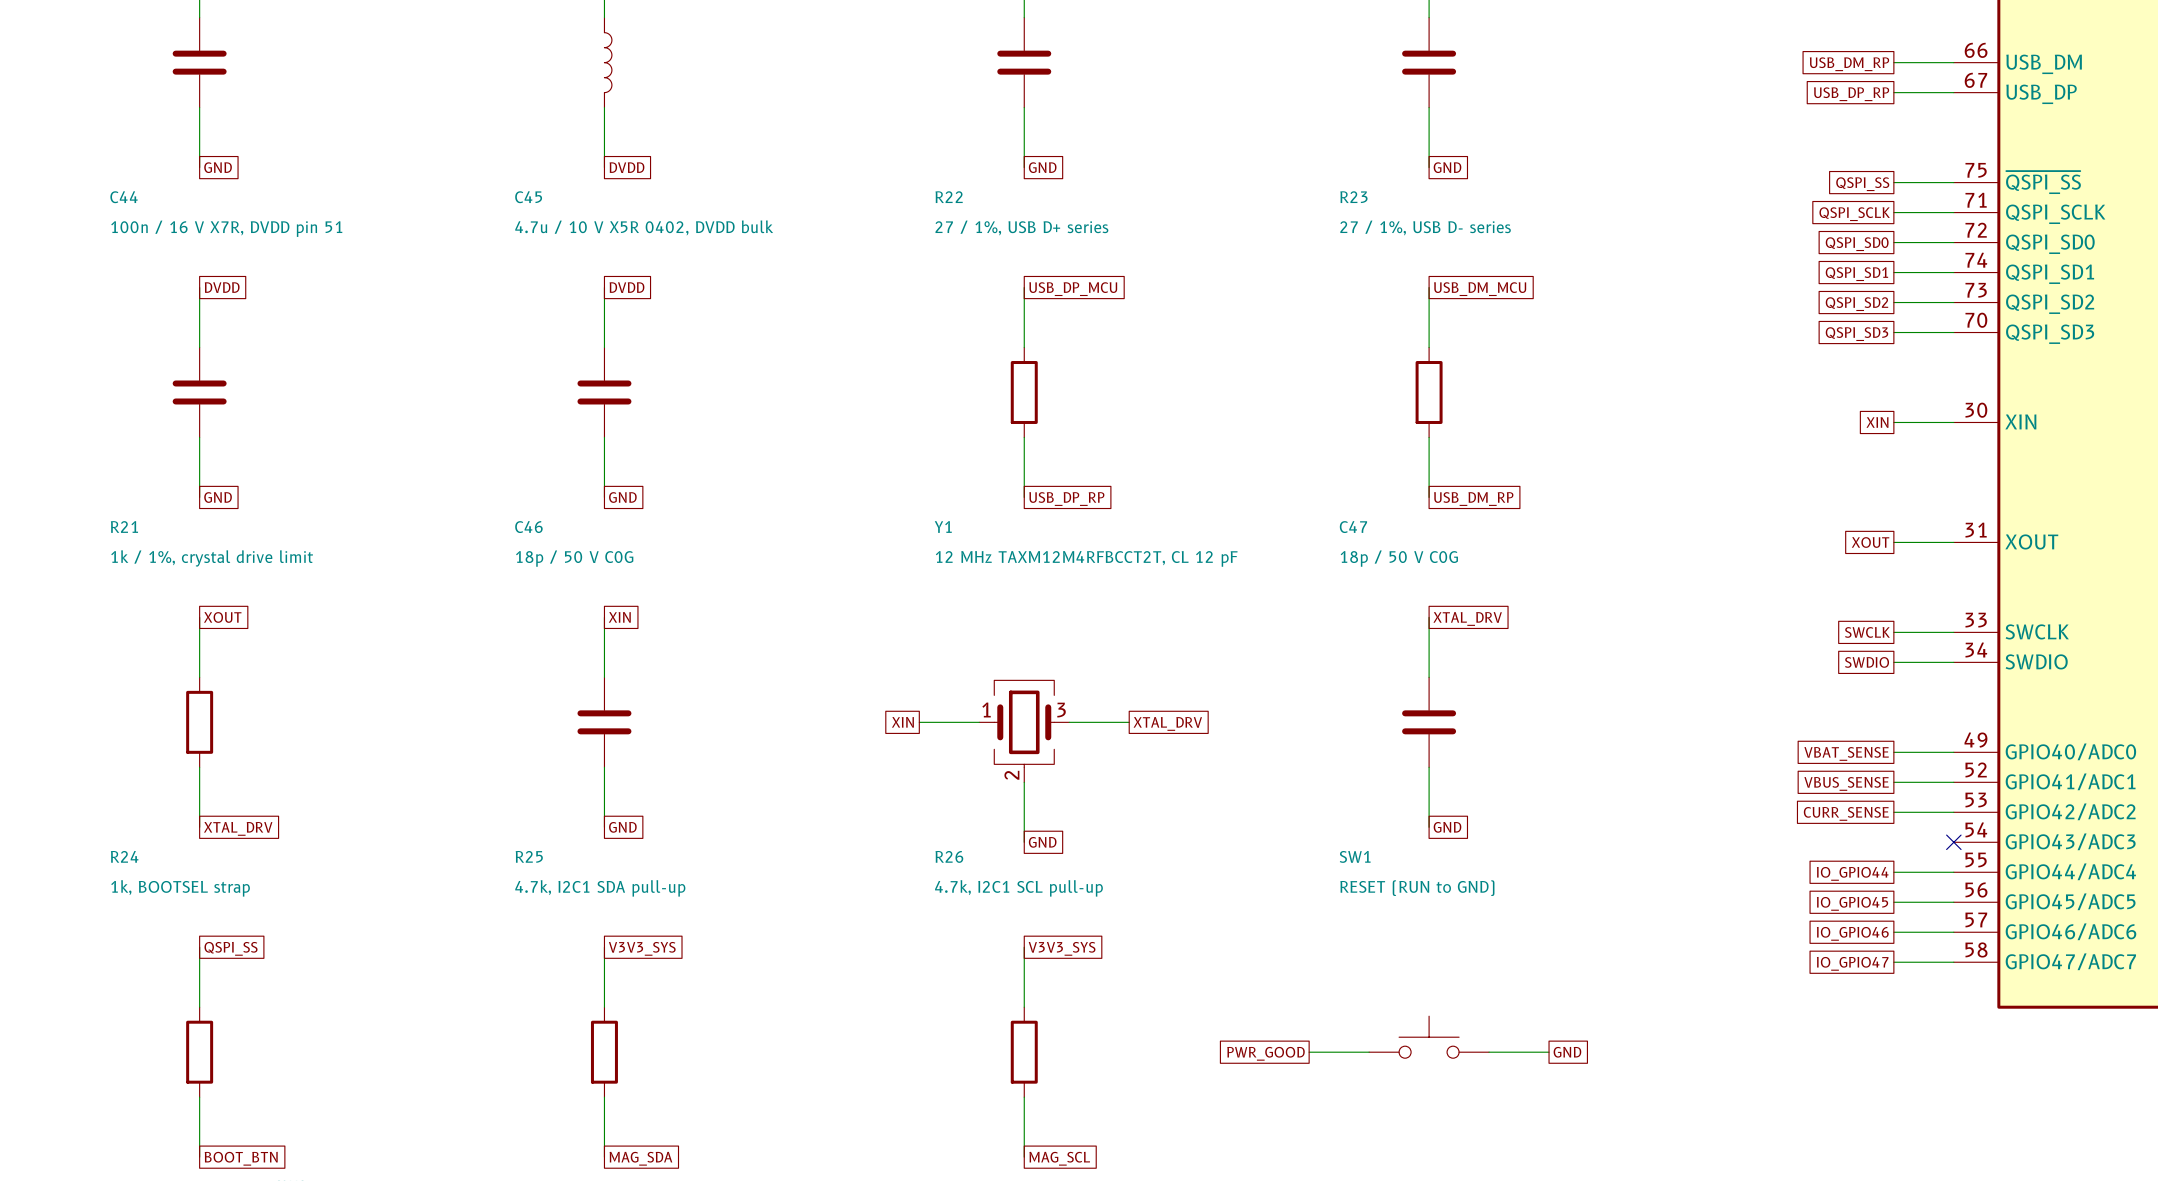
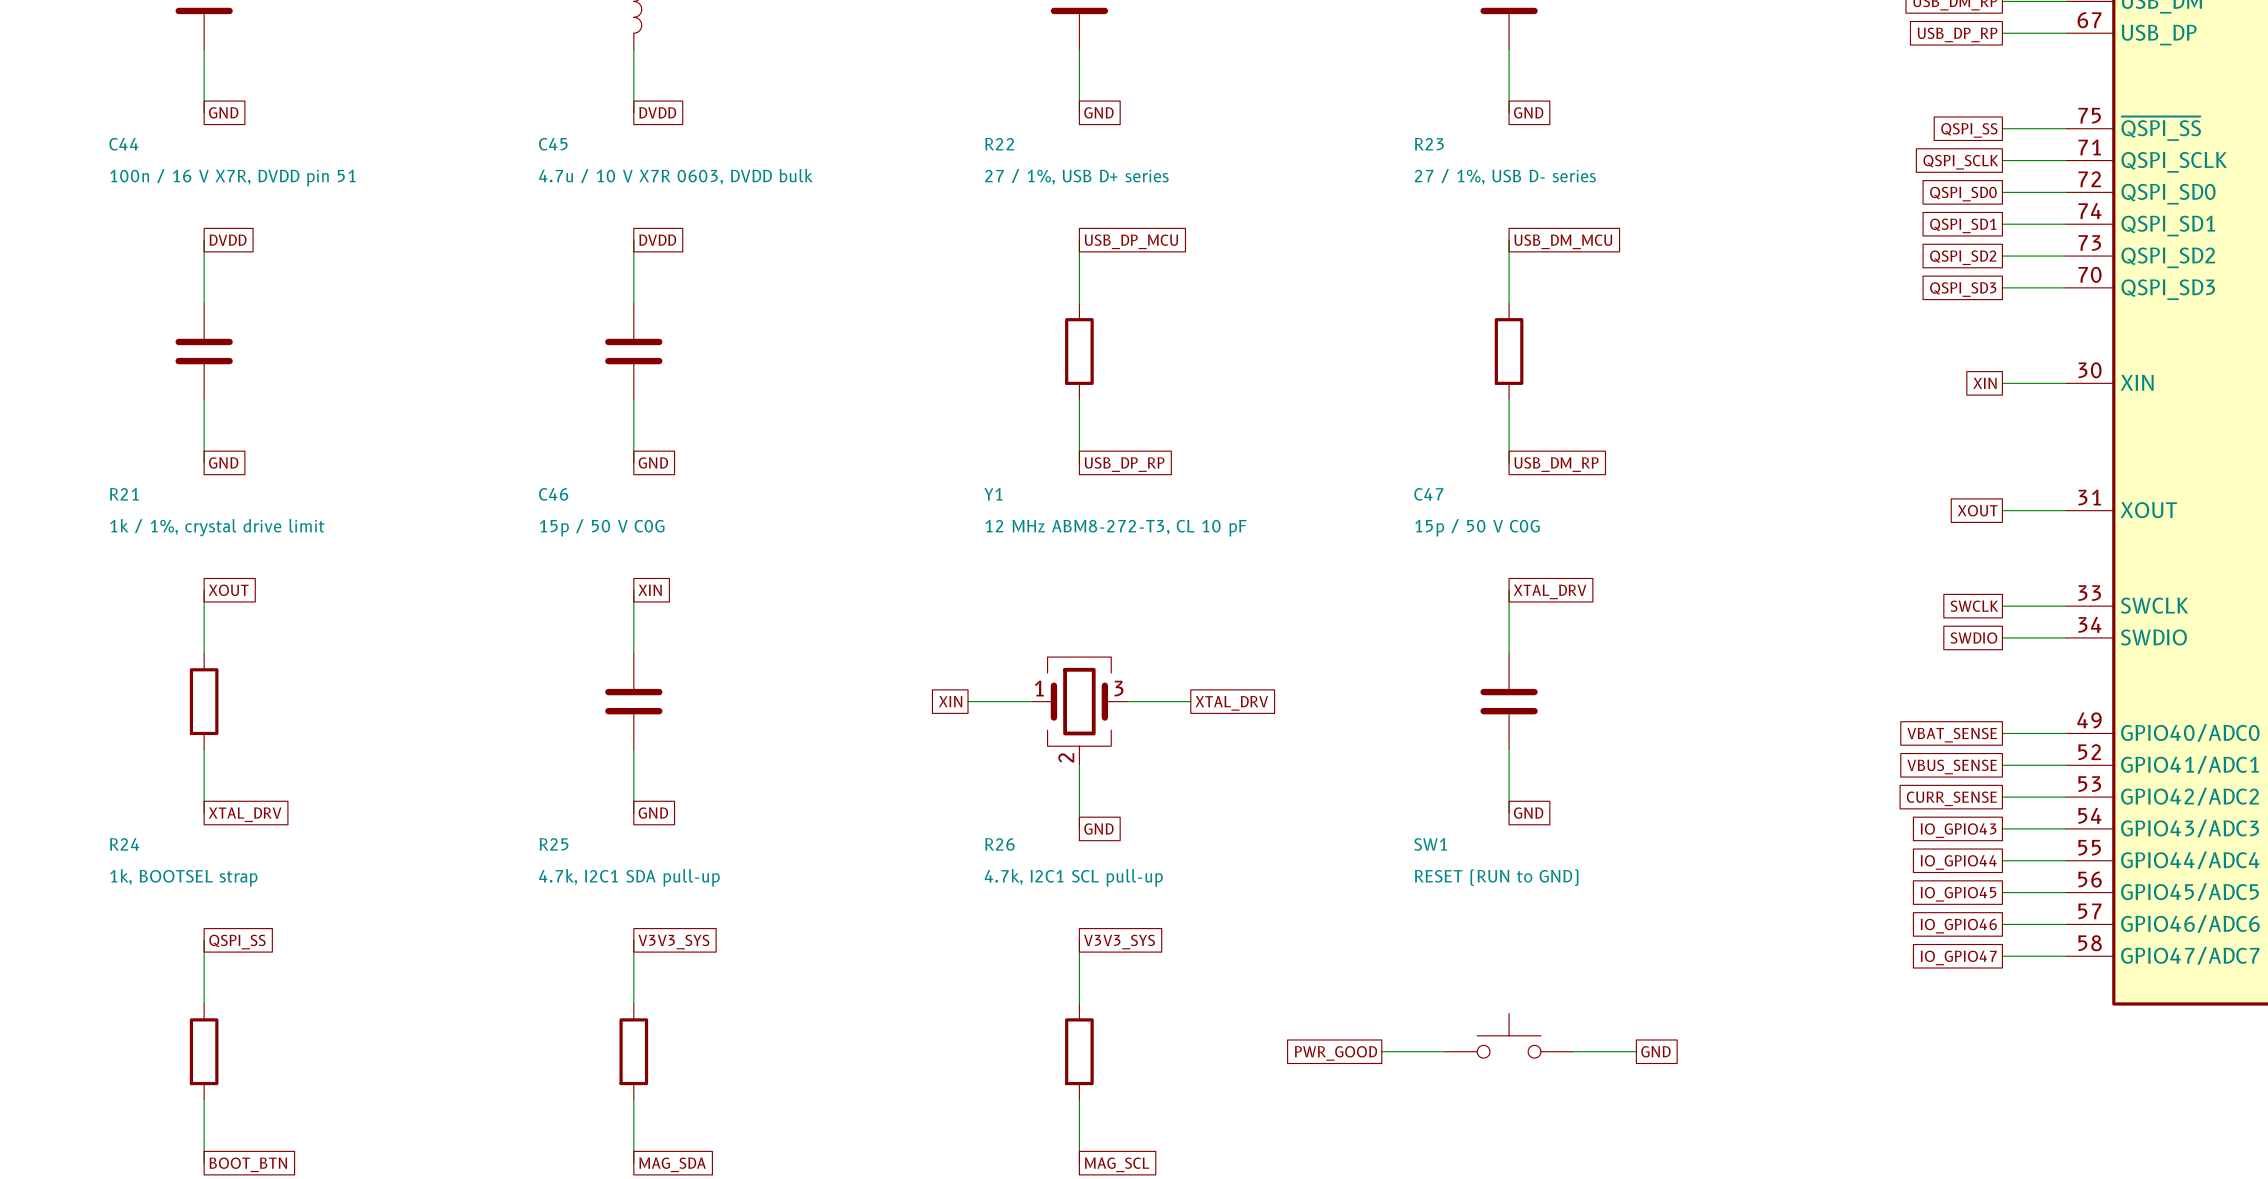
C45 value: 4.7u / 10 V X5R 0402, DVDD bulk (644, 227) -> 4.7u / 10 V X7R 0603, DVDD bulk (676, 176)
C46 value: 18p / 50 V C0G (574, 558) -> 15p / 50 V C0G (602, 527)
Y1 value: 12 MHz TAXM12M4RFBCCT2T, CL 12 pF (1086, 558) -> 12 MHz ABM8-272-T3, CL 10 pF (1115, 528)
C47 value: 18p / 50 V C0G (1399, 558) -> 15p / 50 V C0G (1477, 527)
wire: none -> (2002, 828) (2066, 828)
no-connect mark: (1953, 842) -> none
global label: none -> IO_GPIO43 (1958, 830)

